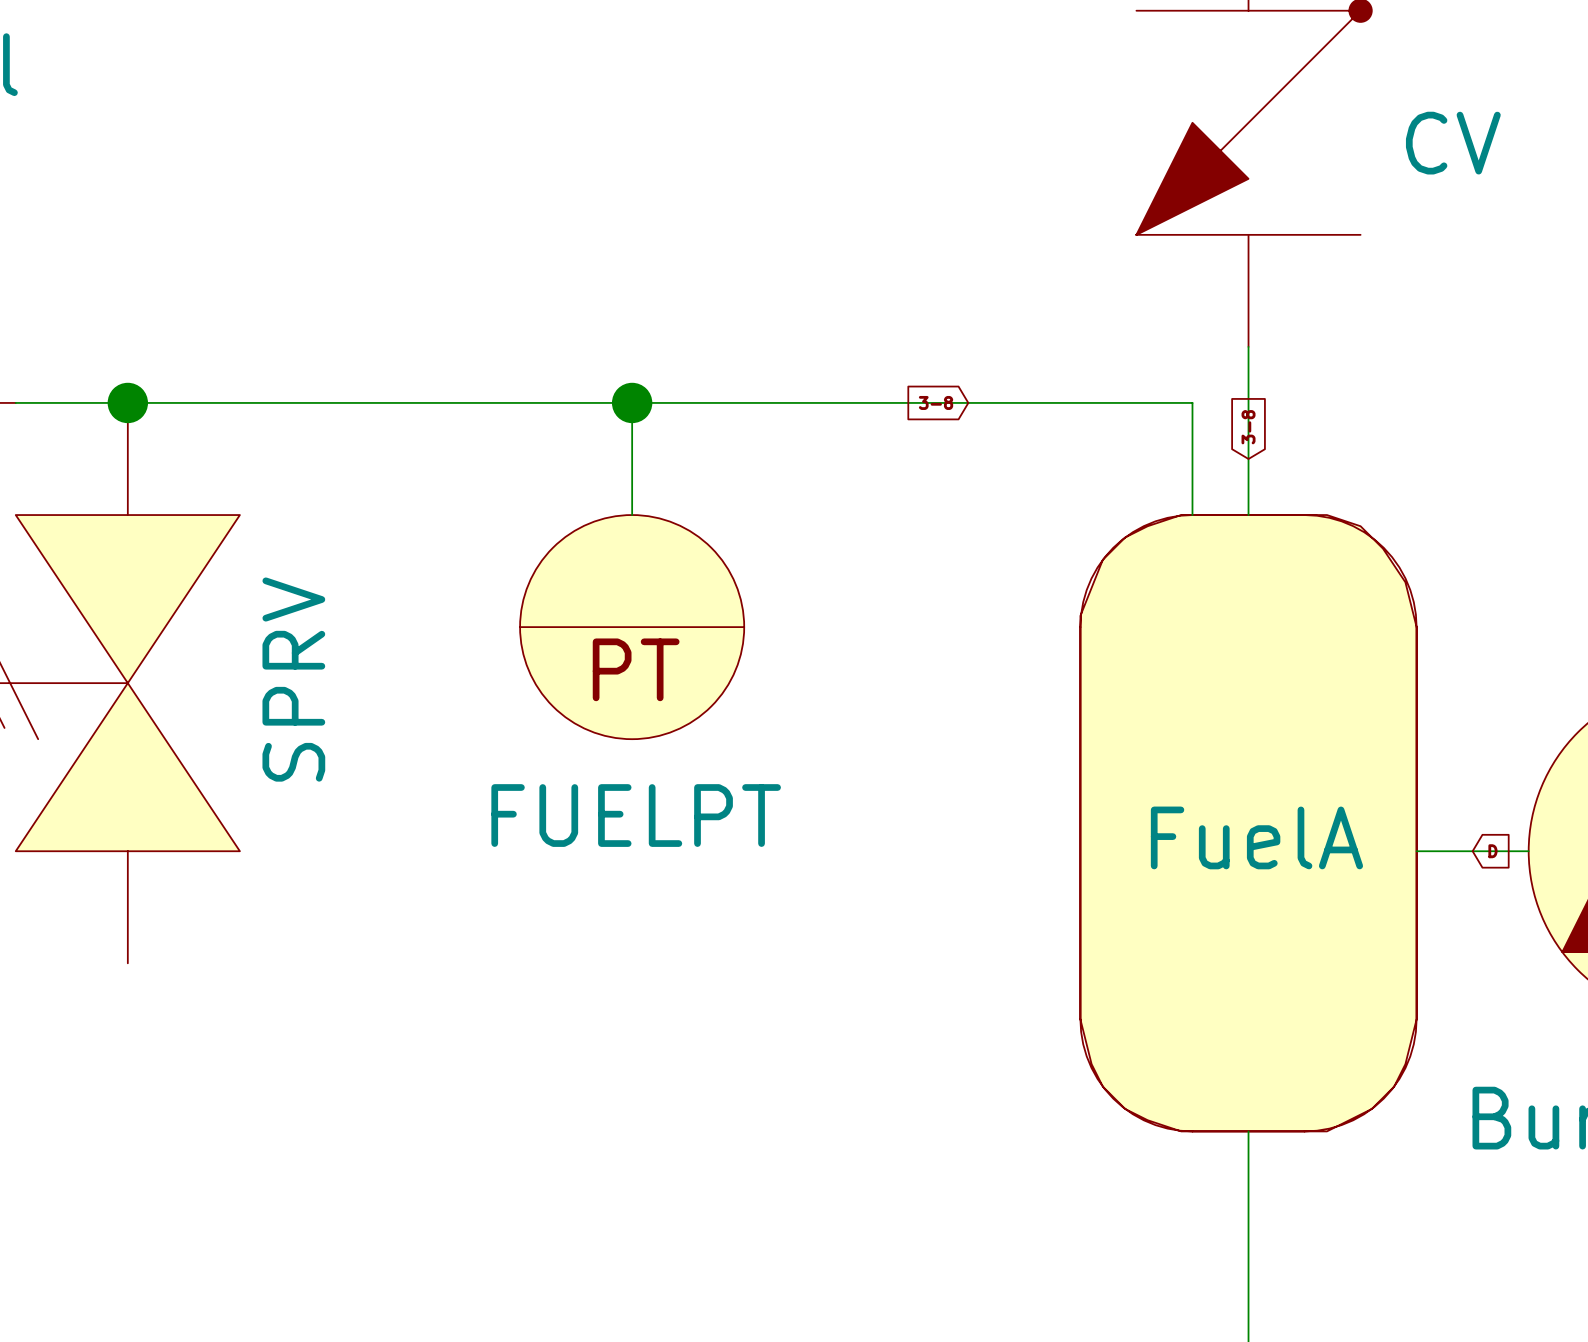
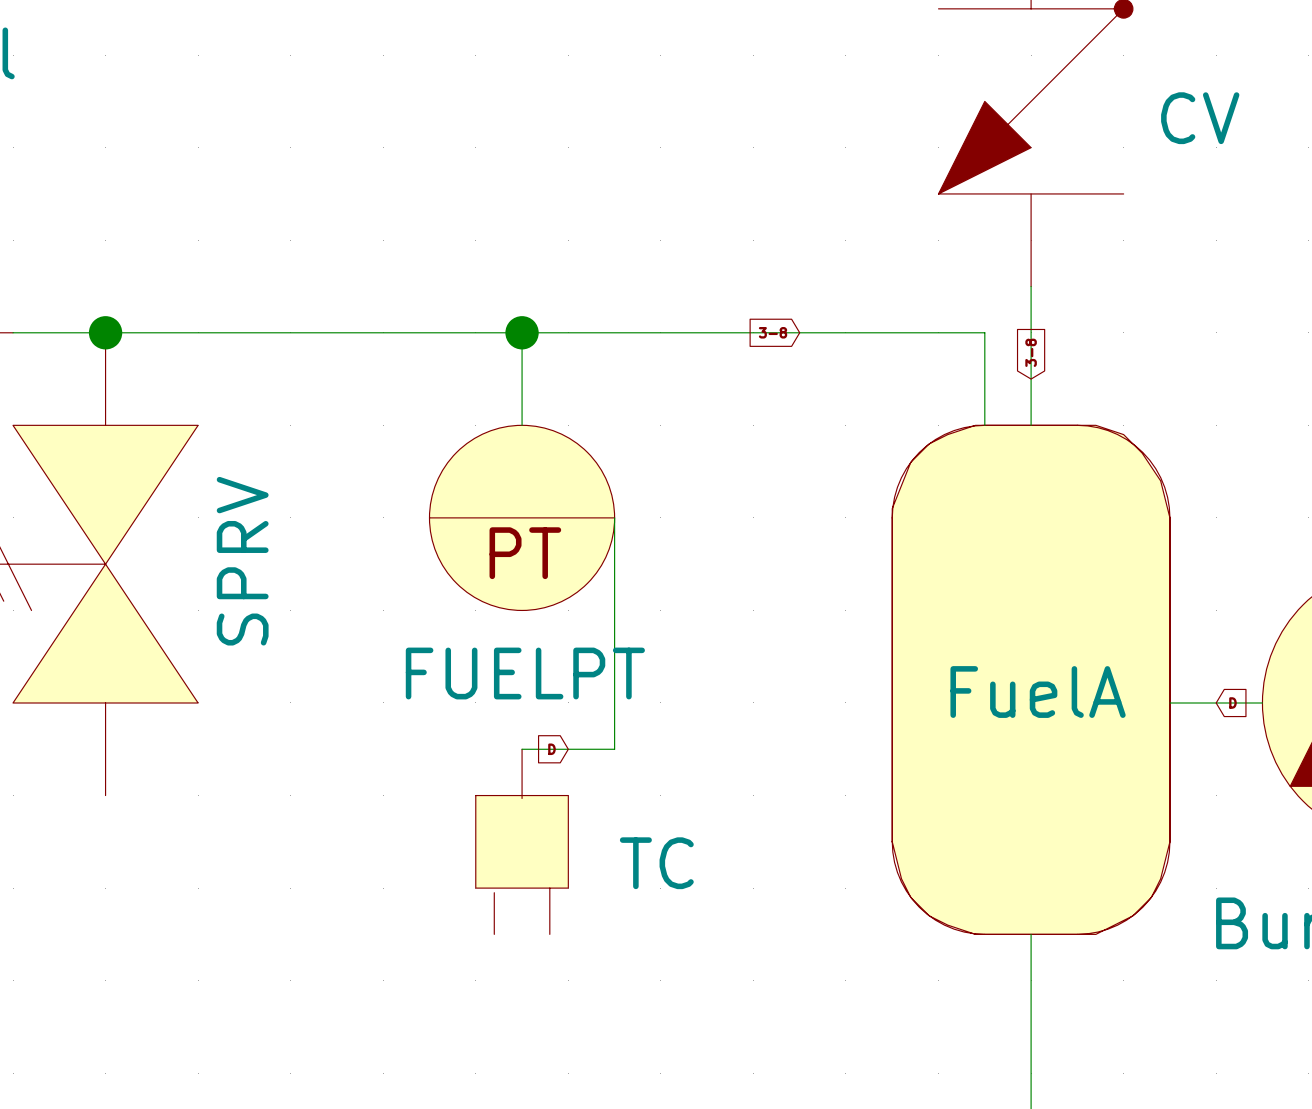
wire: none -> (614, 517) (614, 749) (522, 749)
global label: none -> D (551, 749)
TC: none -> (522, 841)

